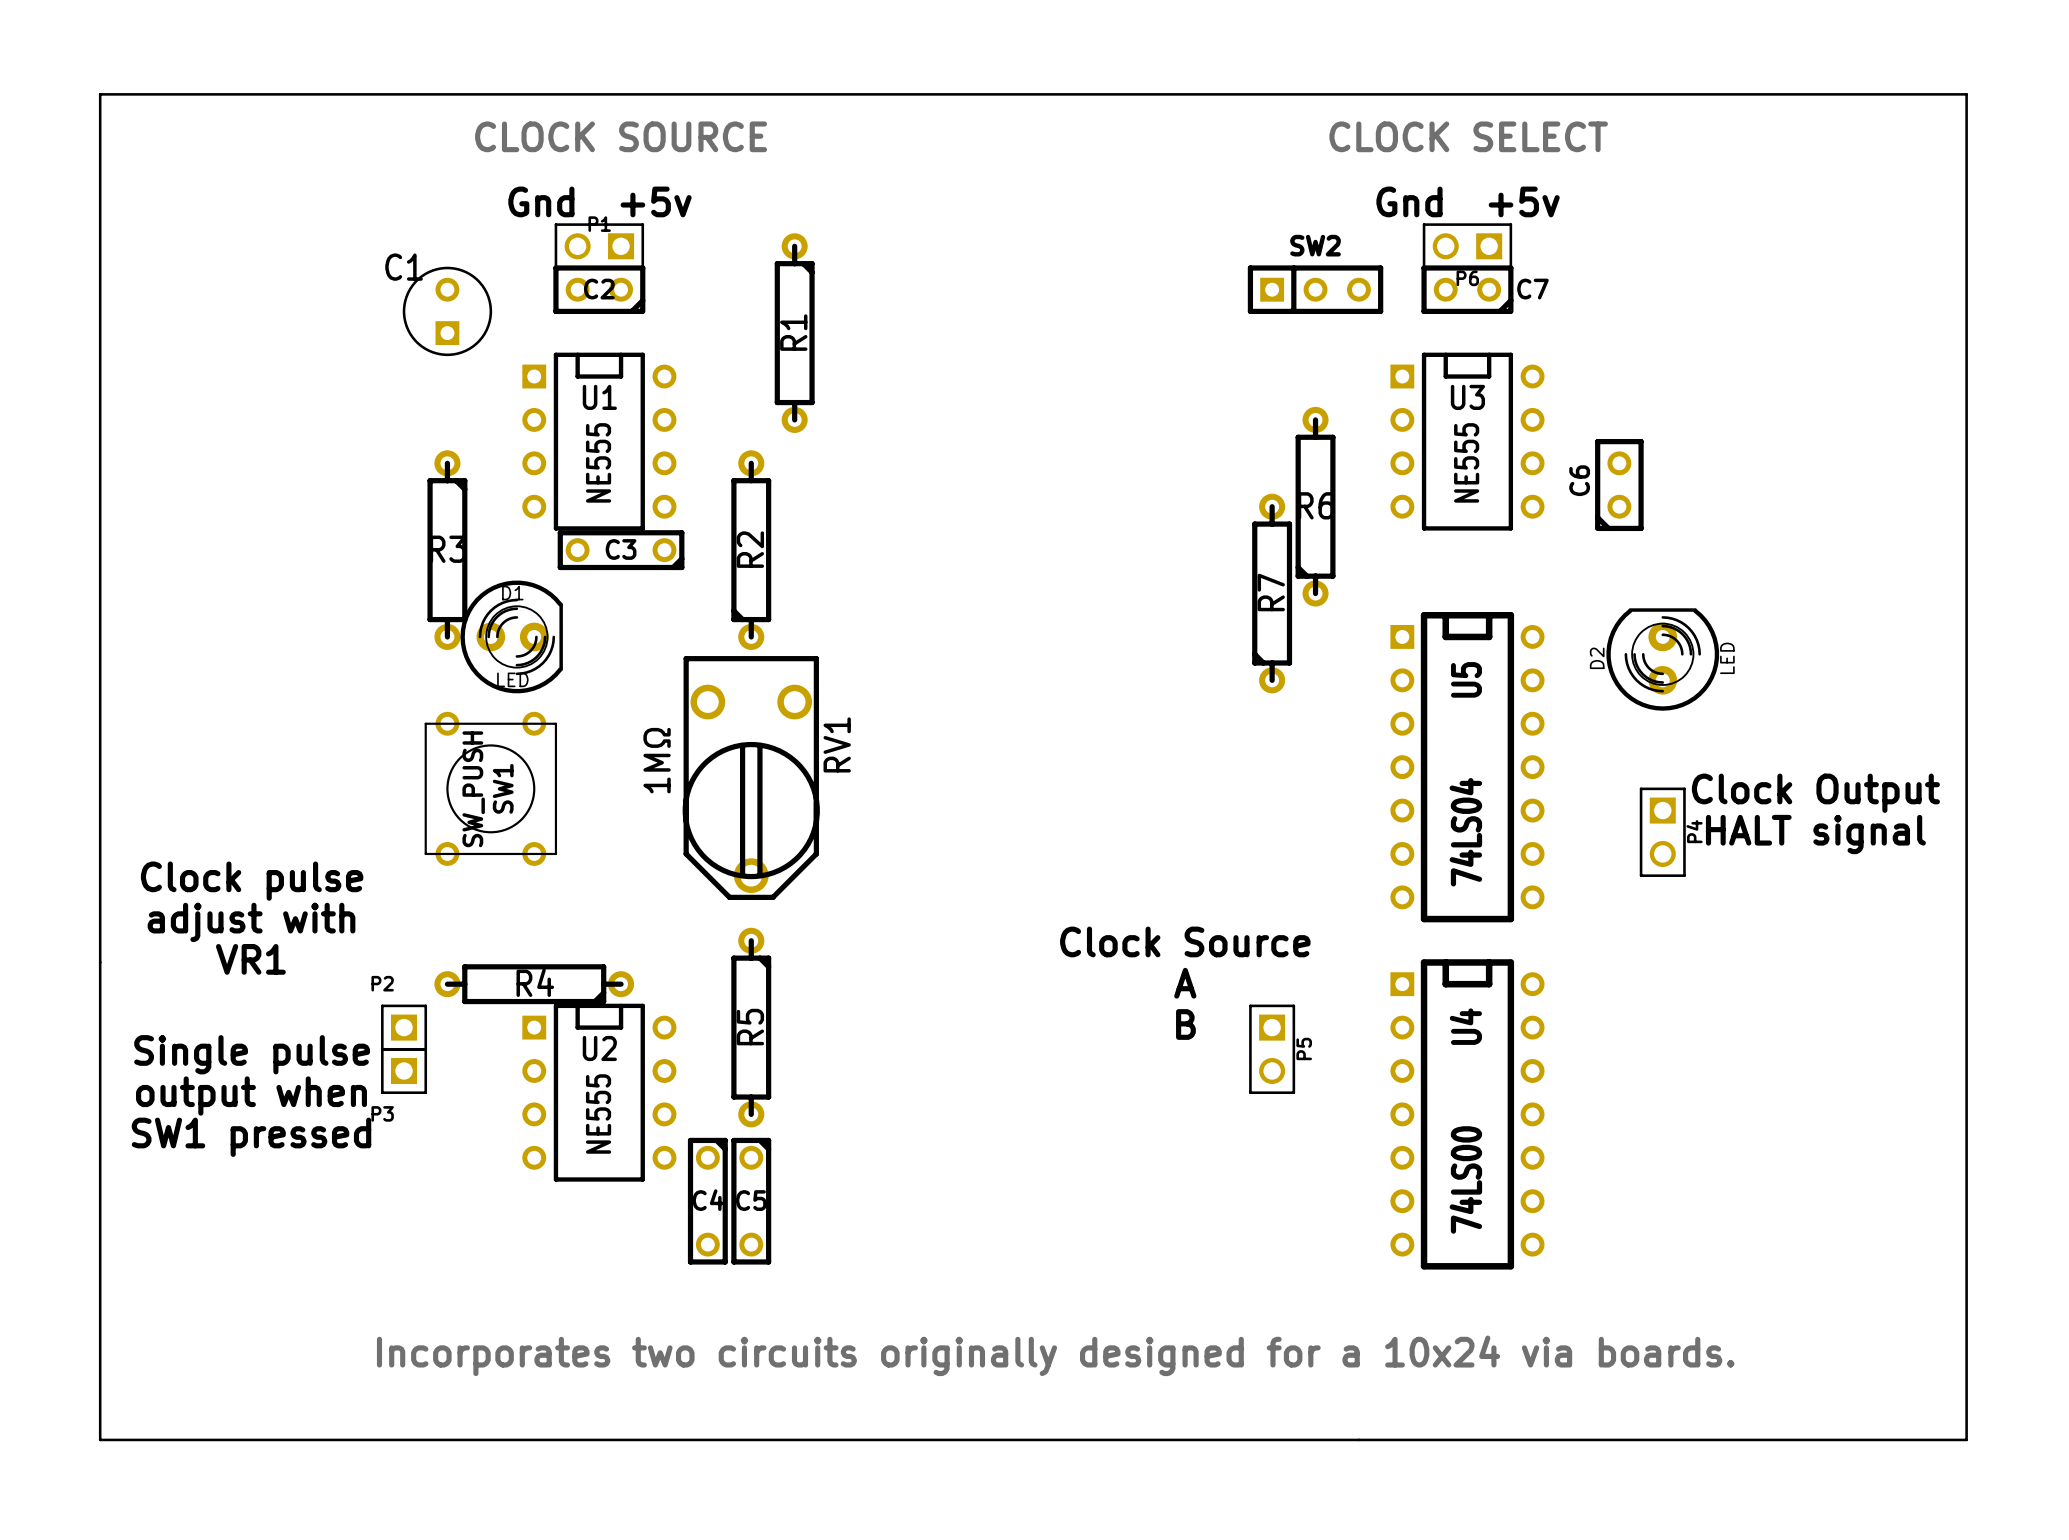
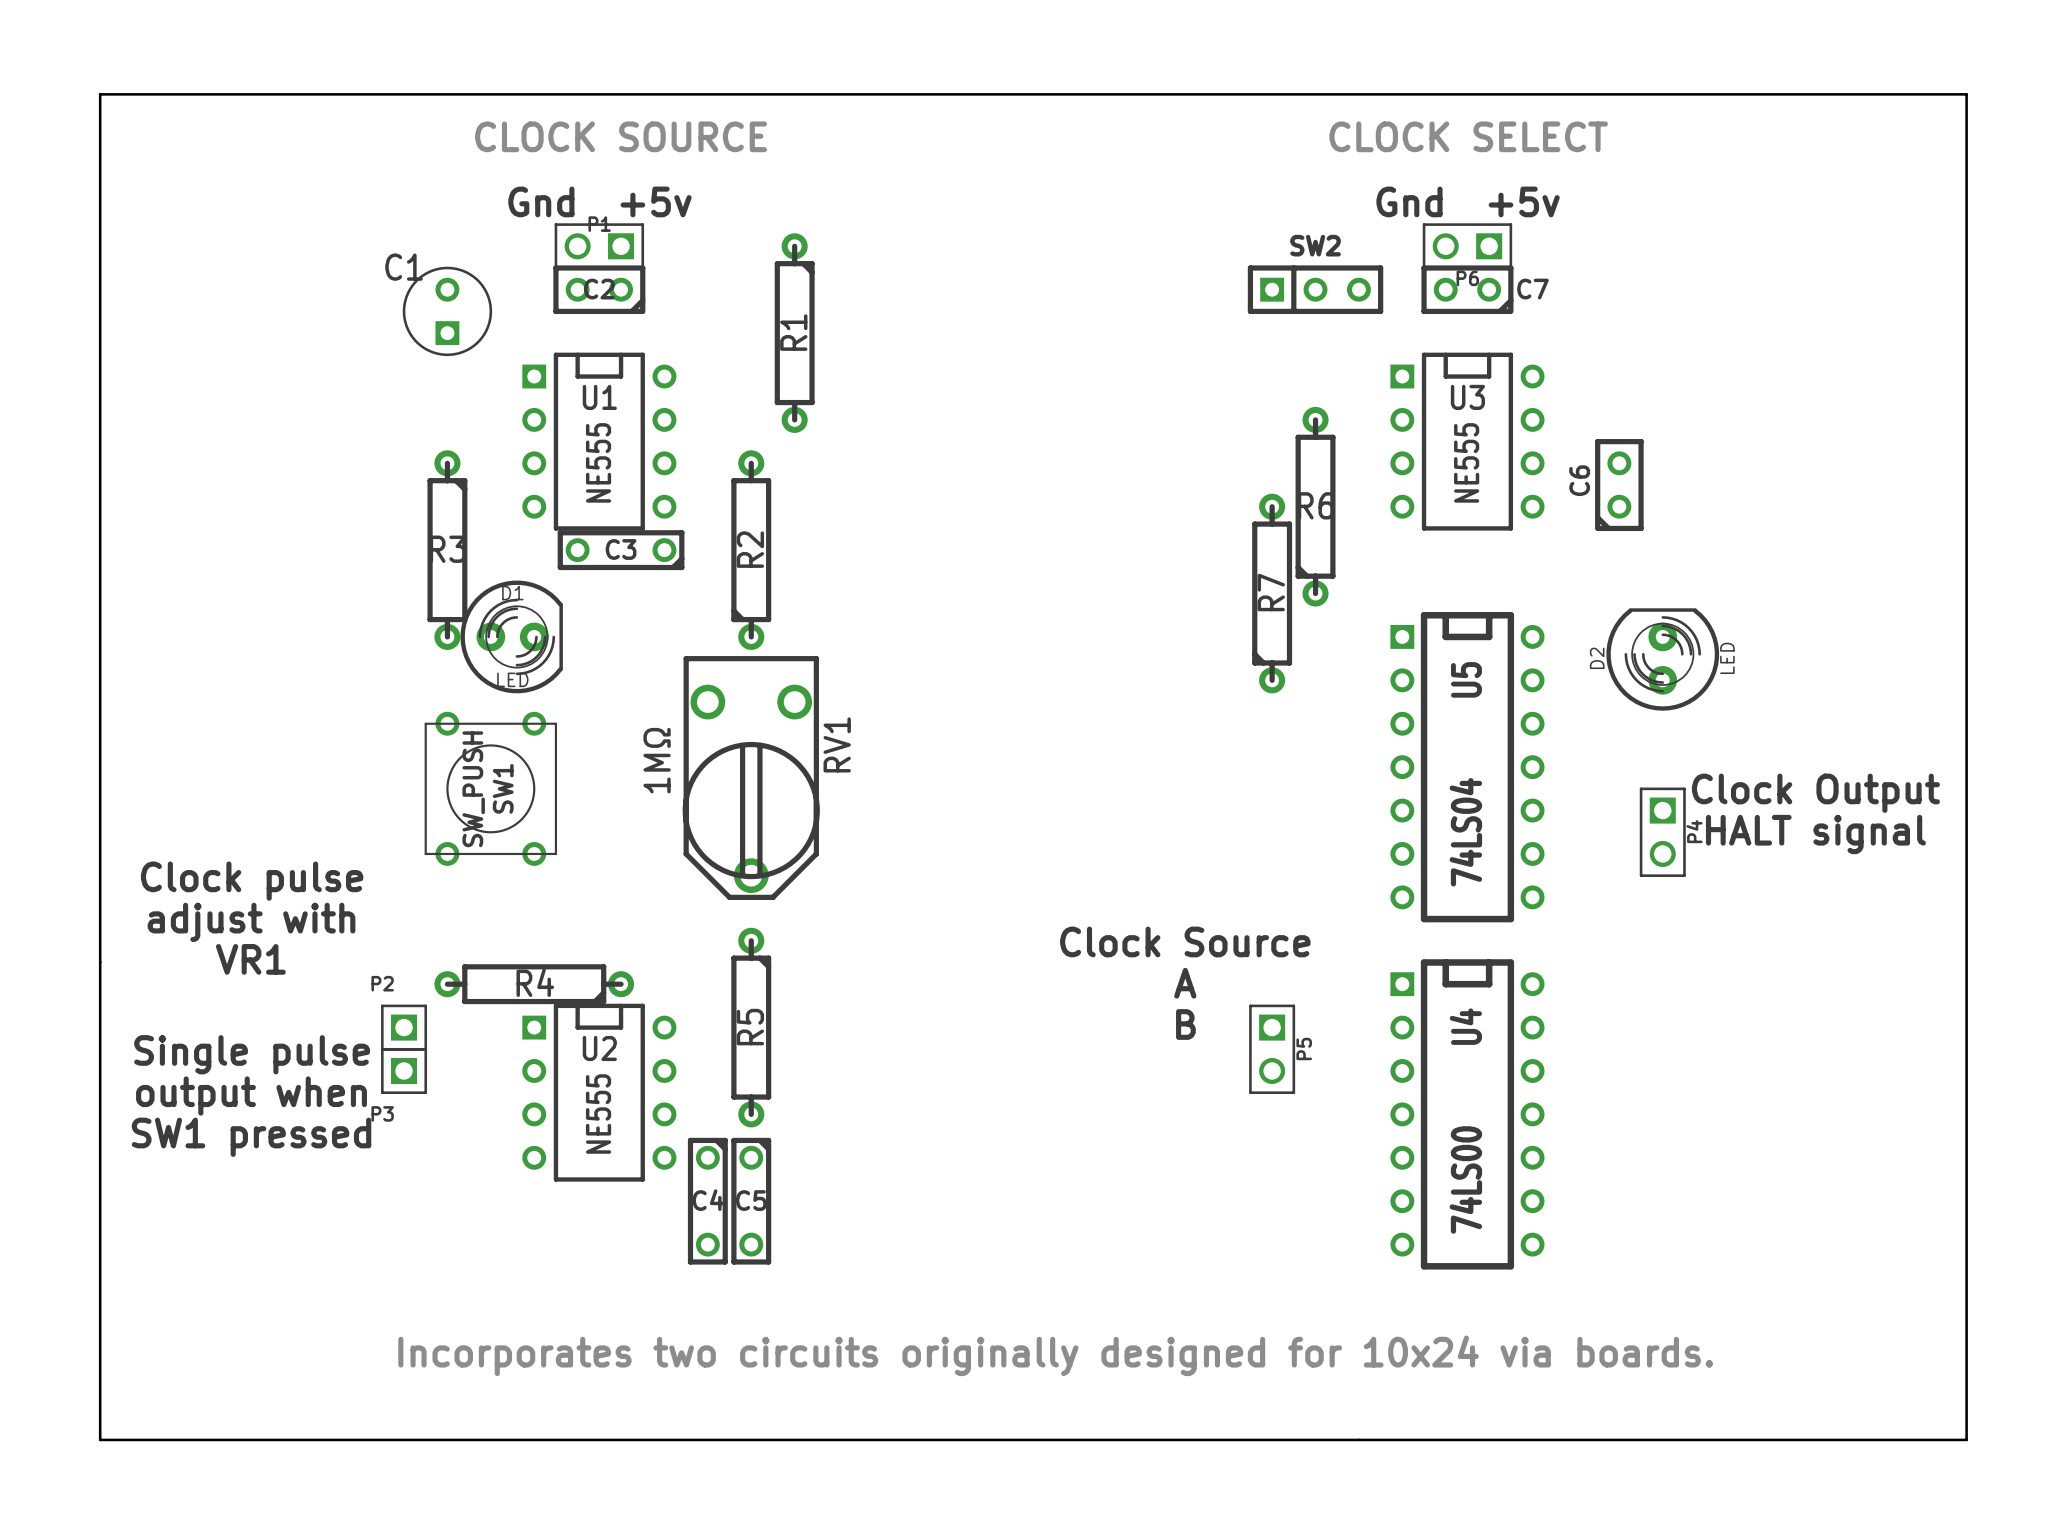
text: Incorporates two circuits originally designed for a 10x24 via boards. (1055, 1355) -> Incorporates two circuits originally designed for 10x24 via boards. (1055, 1355)

